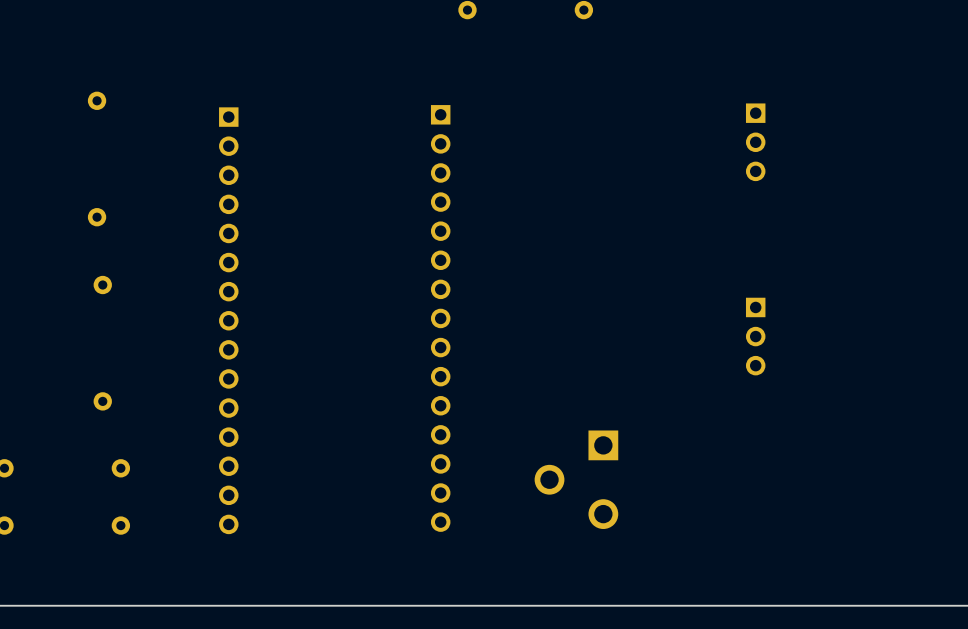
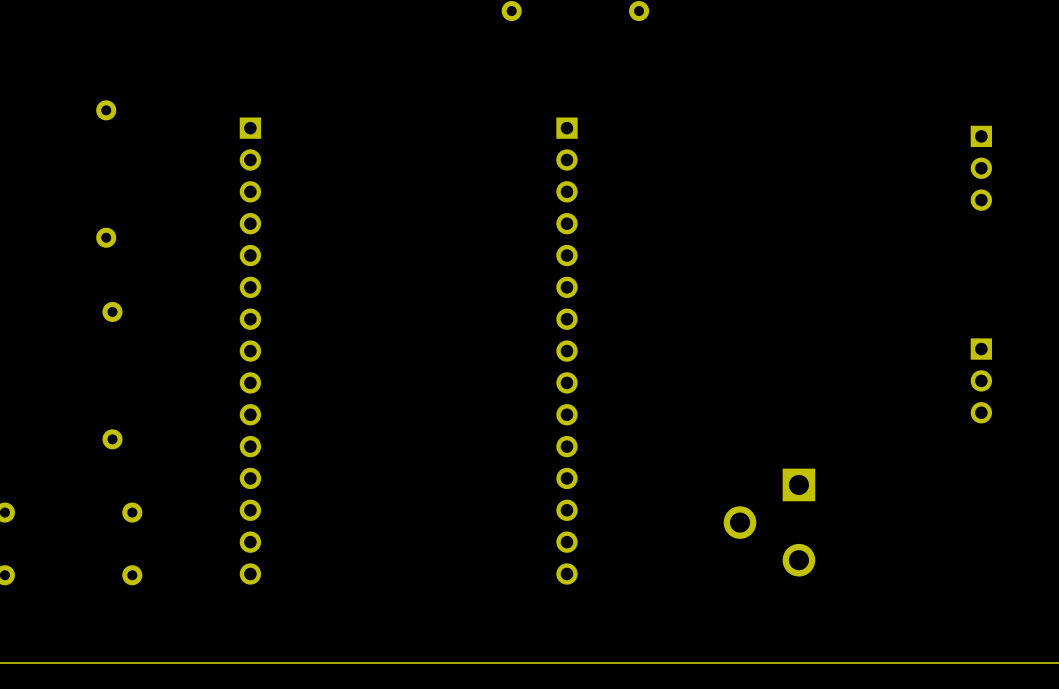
part: (755, 142) -> none
part: none -> (981, 168)
part position: (440, 318) -> (566, 351)
part: (755, 336) -> none
part: none -> (981, 380)
part position: (576, 479) -> (769, 522)

